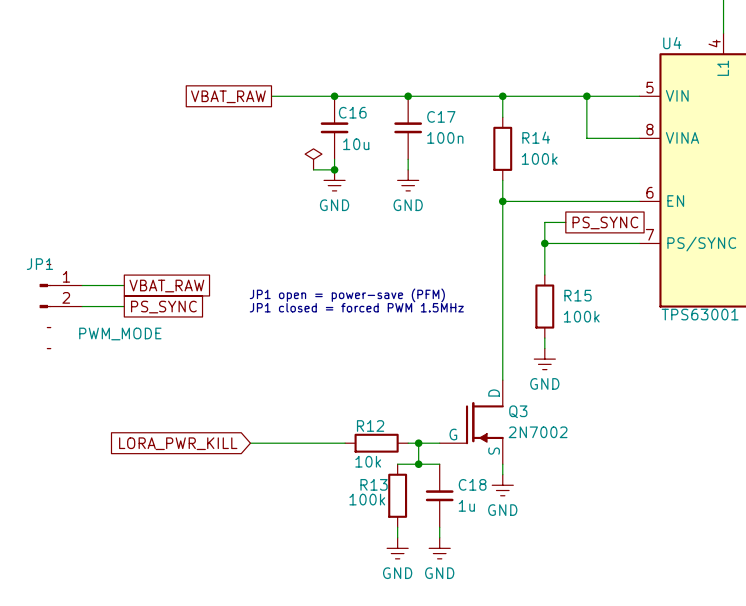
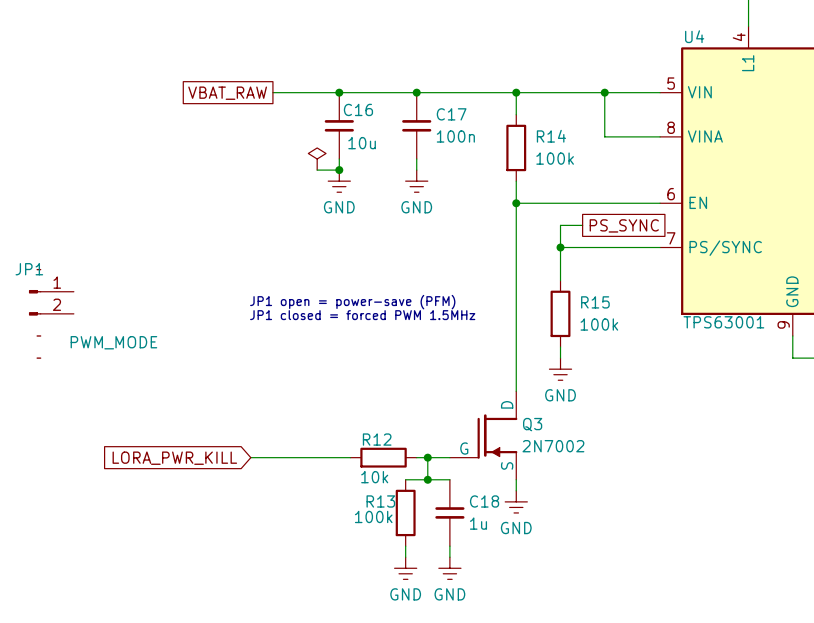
wire: (82, 285) (124, 285) -> none
global label: VBAT_RAW (166, 286) -> none
wire: (82, 306) (124, 306) -> none
global label: PS_SYNC (163, 307) -> none

